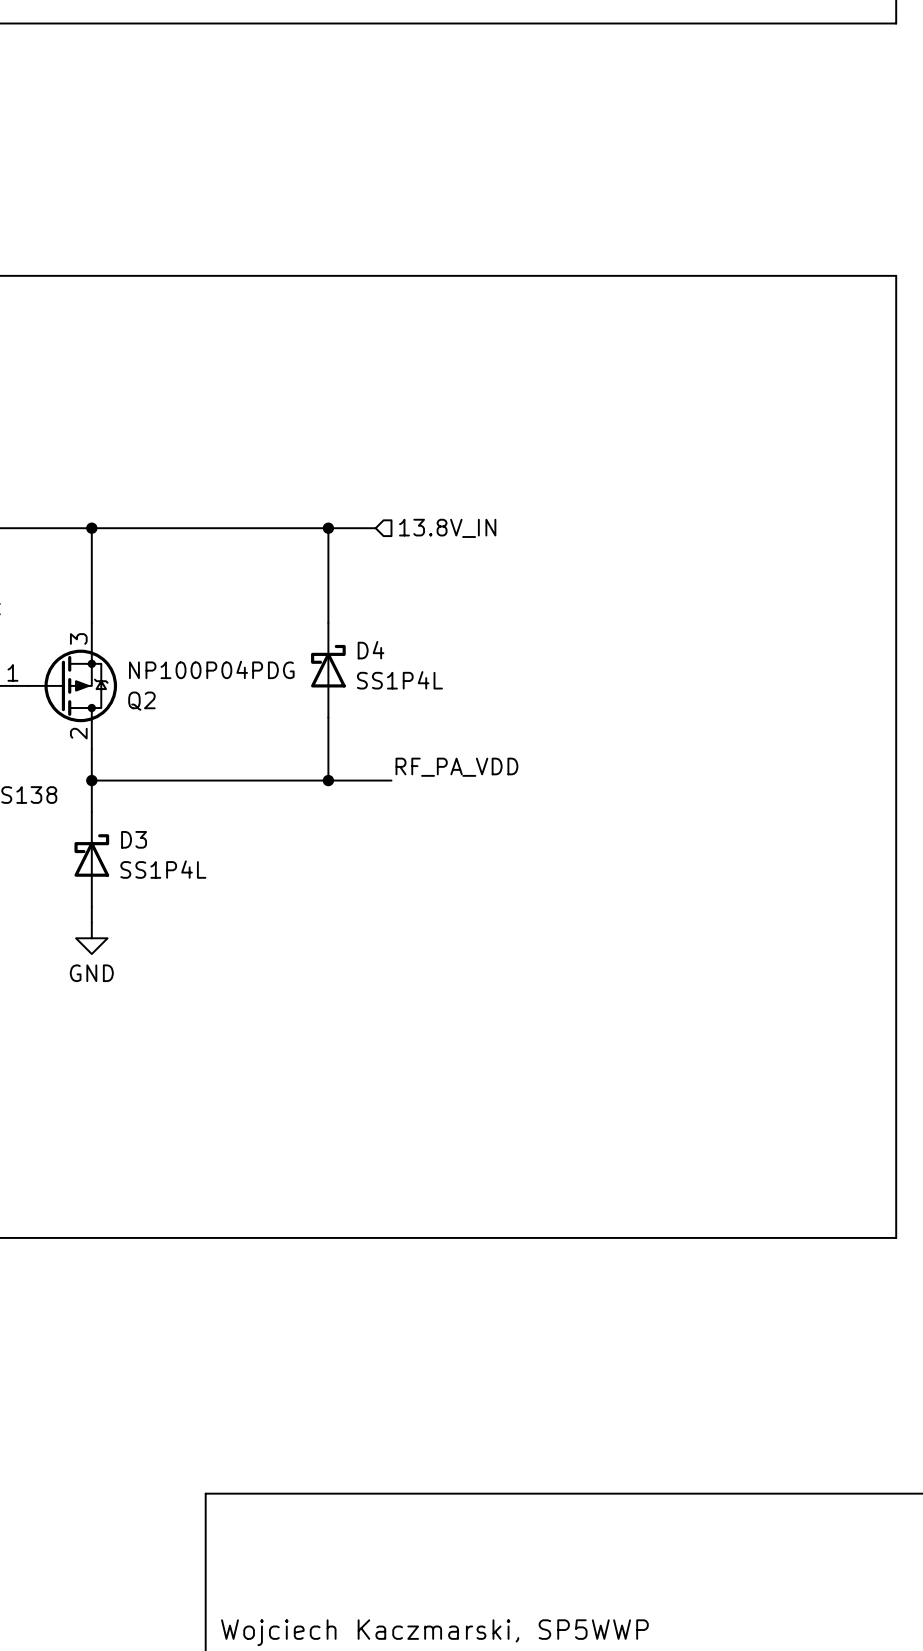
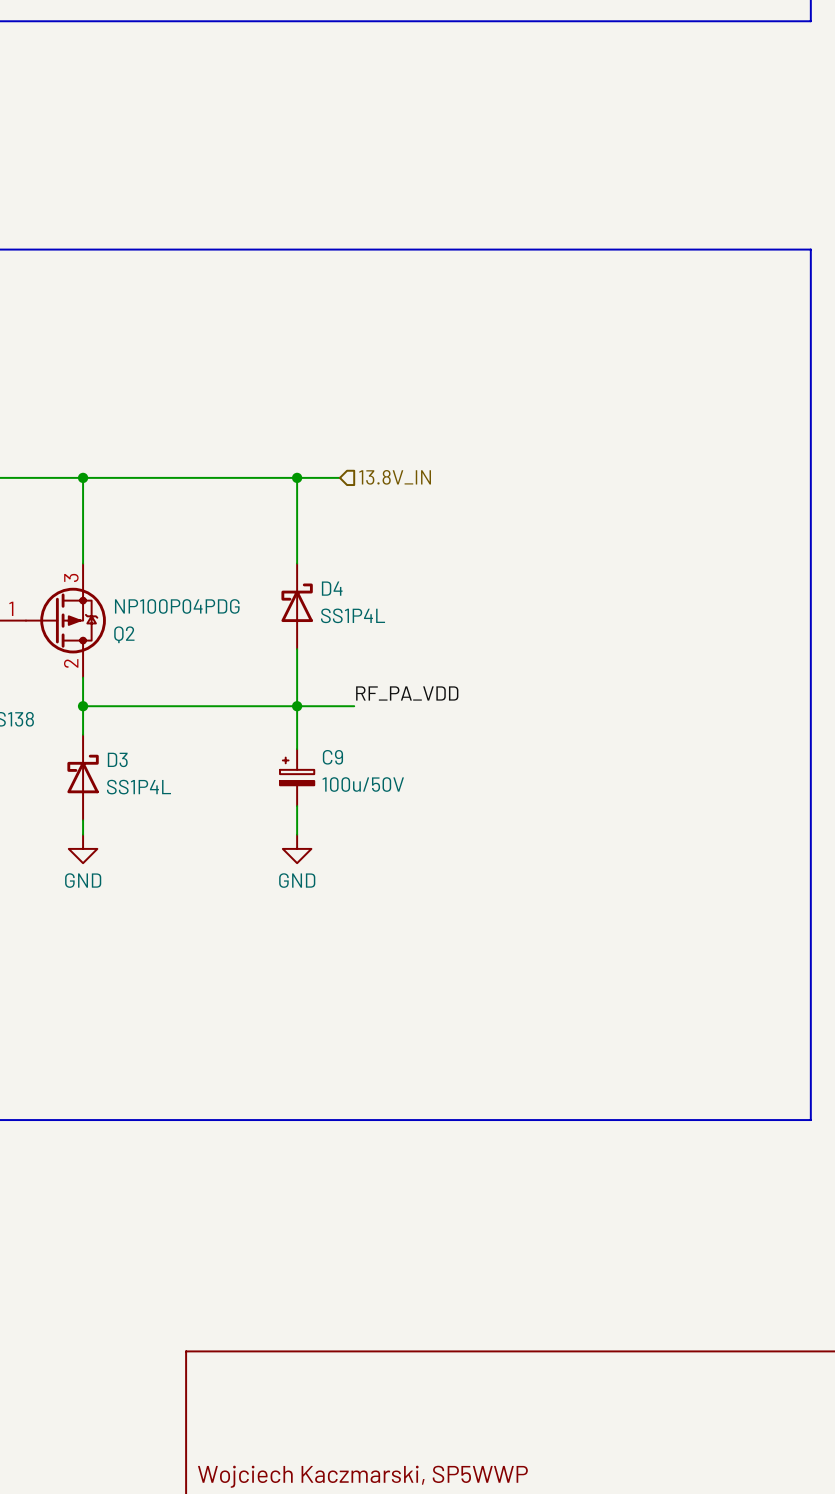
wire: none -> (297, 706) (297, 749)
C9: none -> 100u/50V (297, 777)
wire: none -> (297, 806) (297, 834)
power symbol: none -> GND (297, 848)

